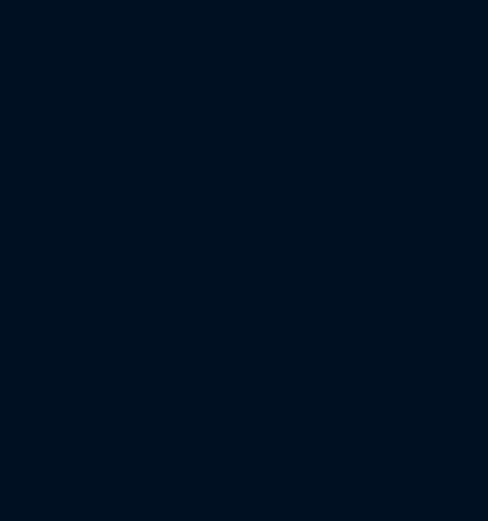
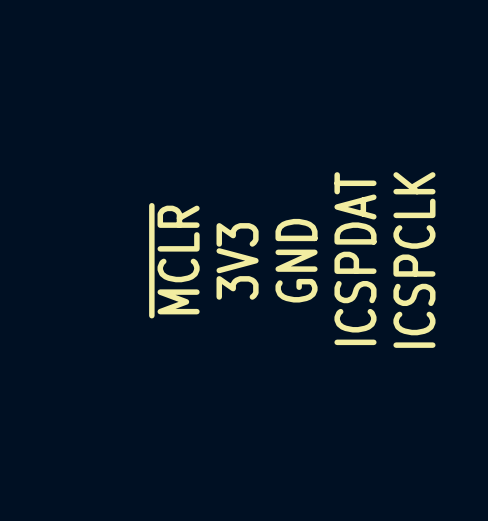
text: none -> ICSPDAT (355, 258)
text: none -> ~{MCLR} (174, 260)
text: none -> GND (296, 260)
text: none -> ICSPCLK (414, 260)
text: none -> 3V3 (237, 261)

